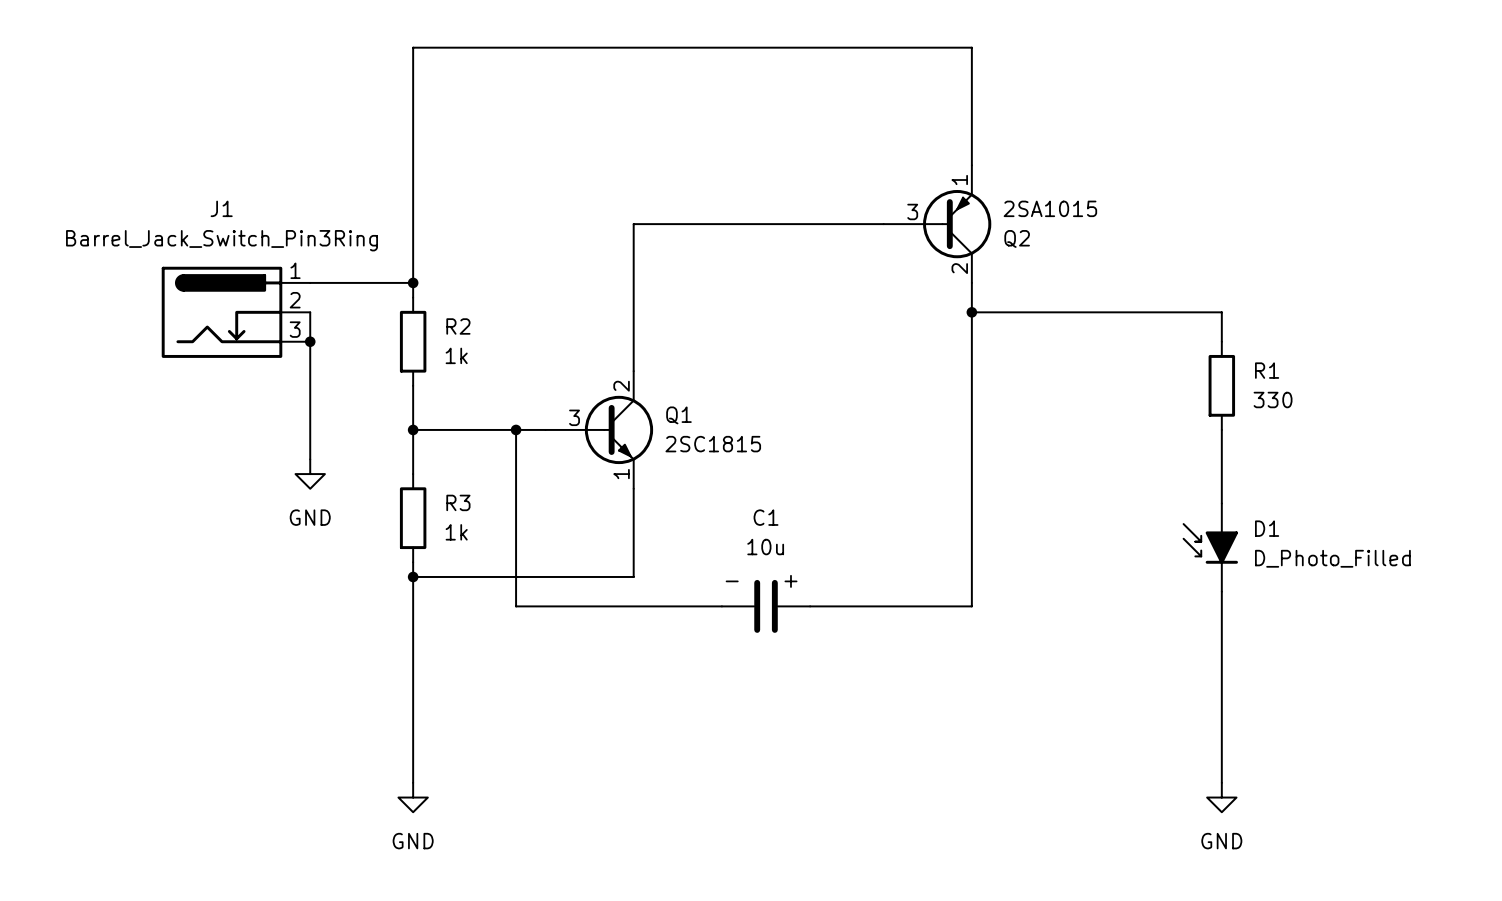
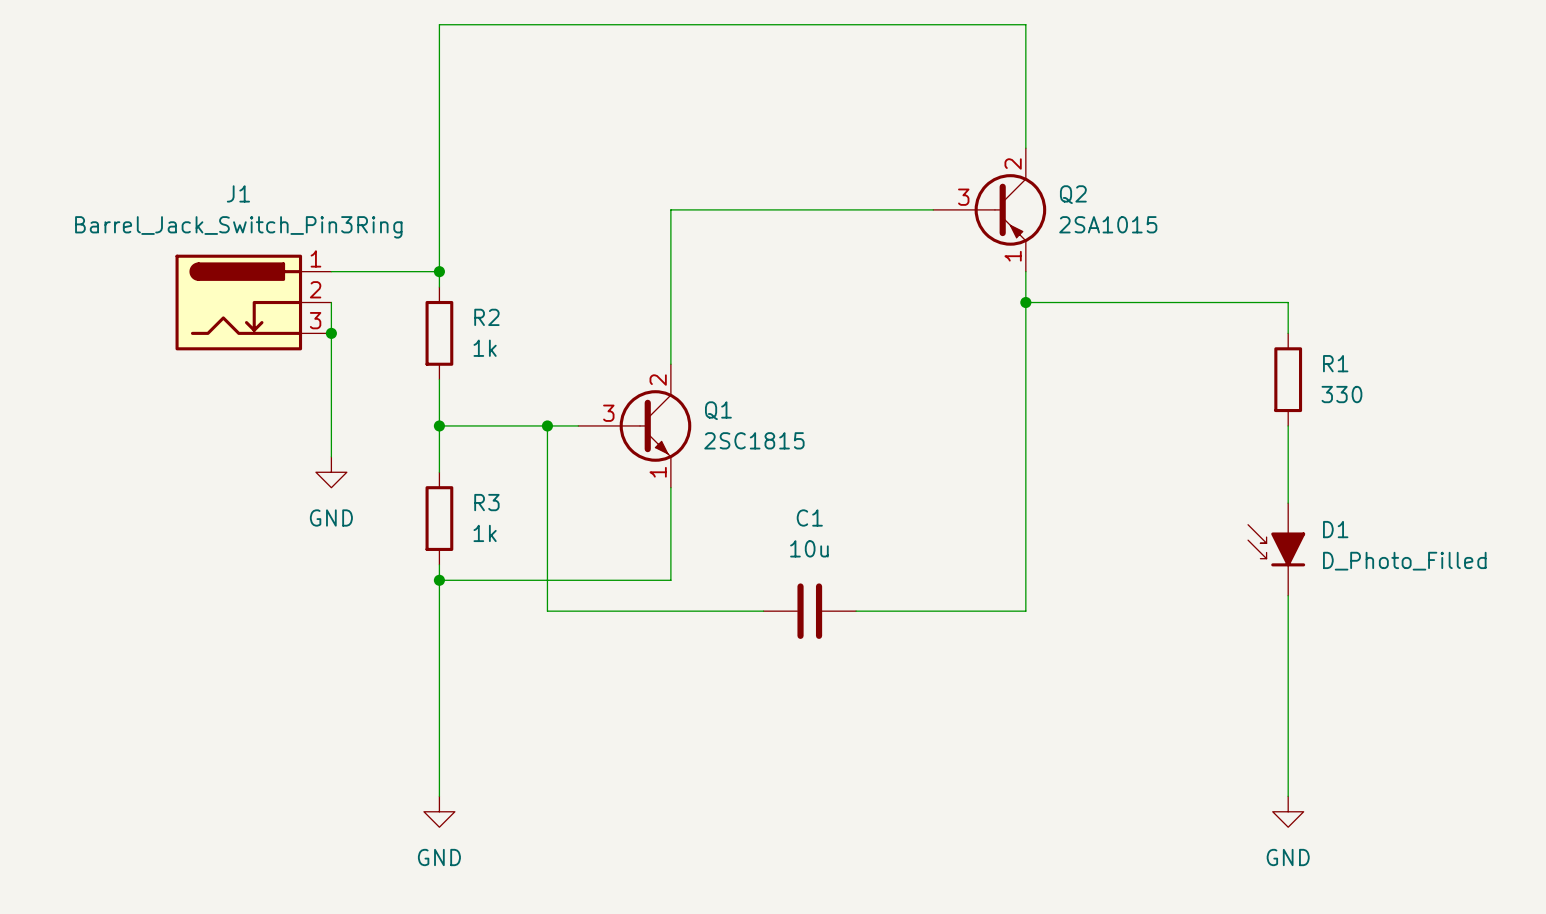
Q2 flip: as is (957, 224) -> up-down (1010, 209)
text: - (732, 581) -> none
text: + (790, 581) -> none

